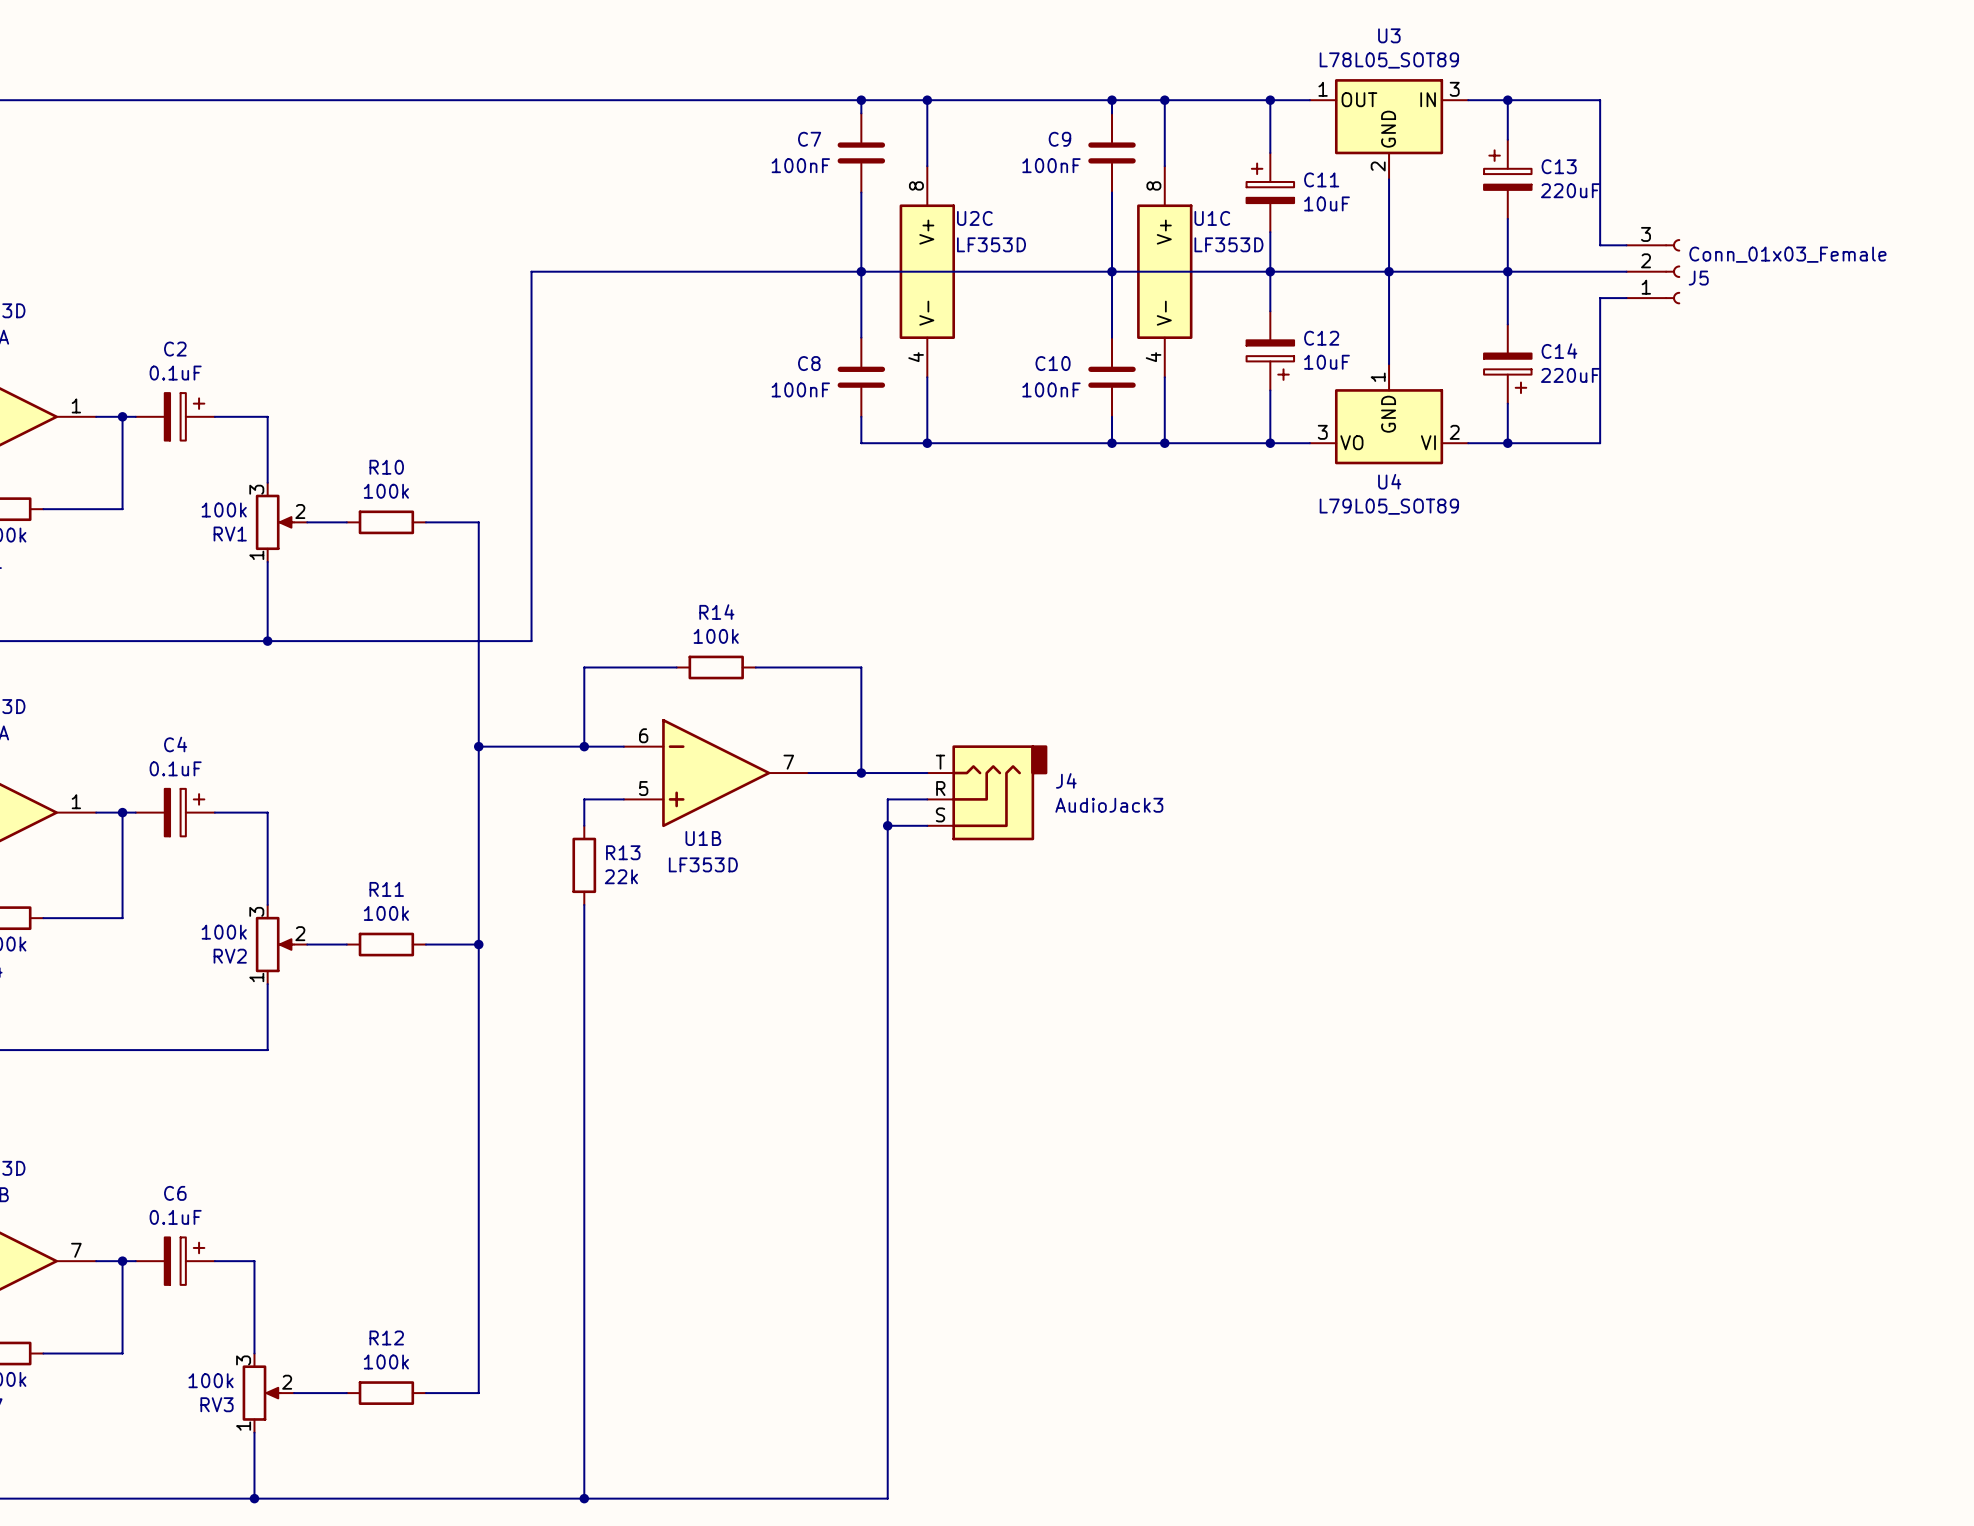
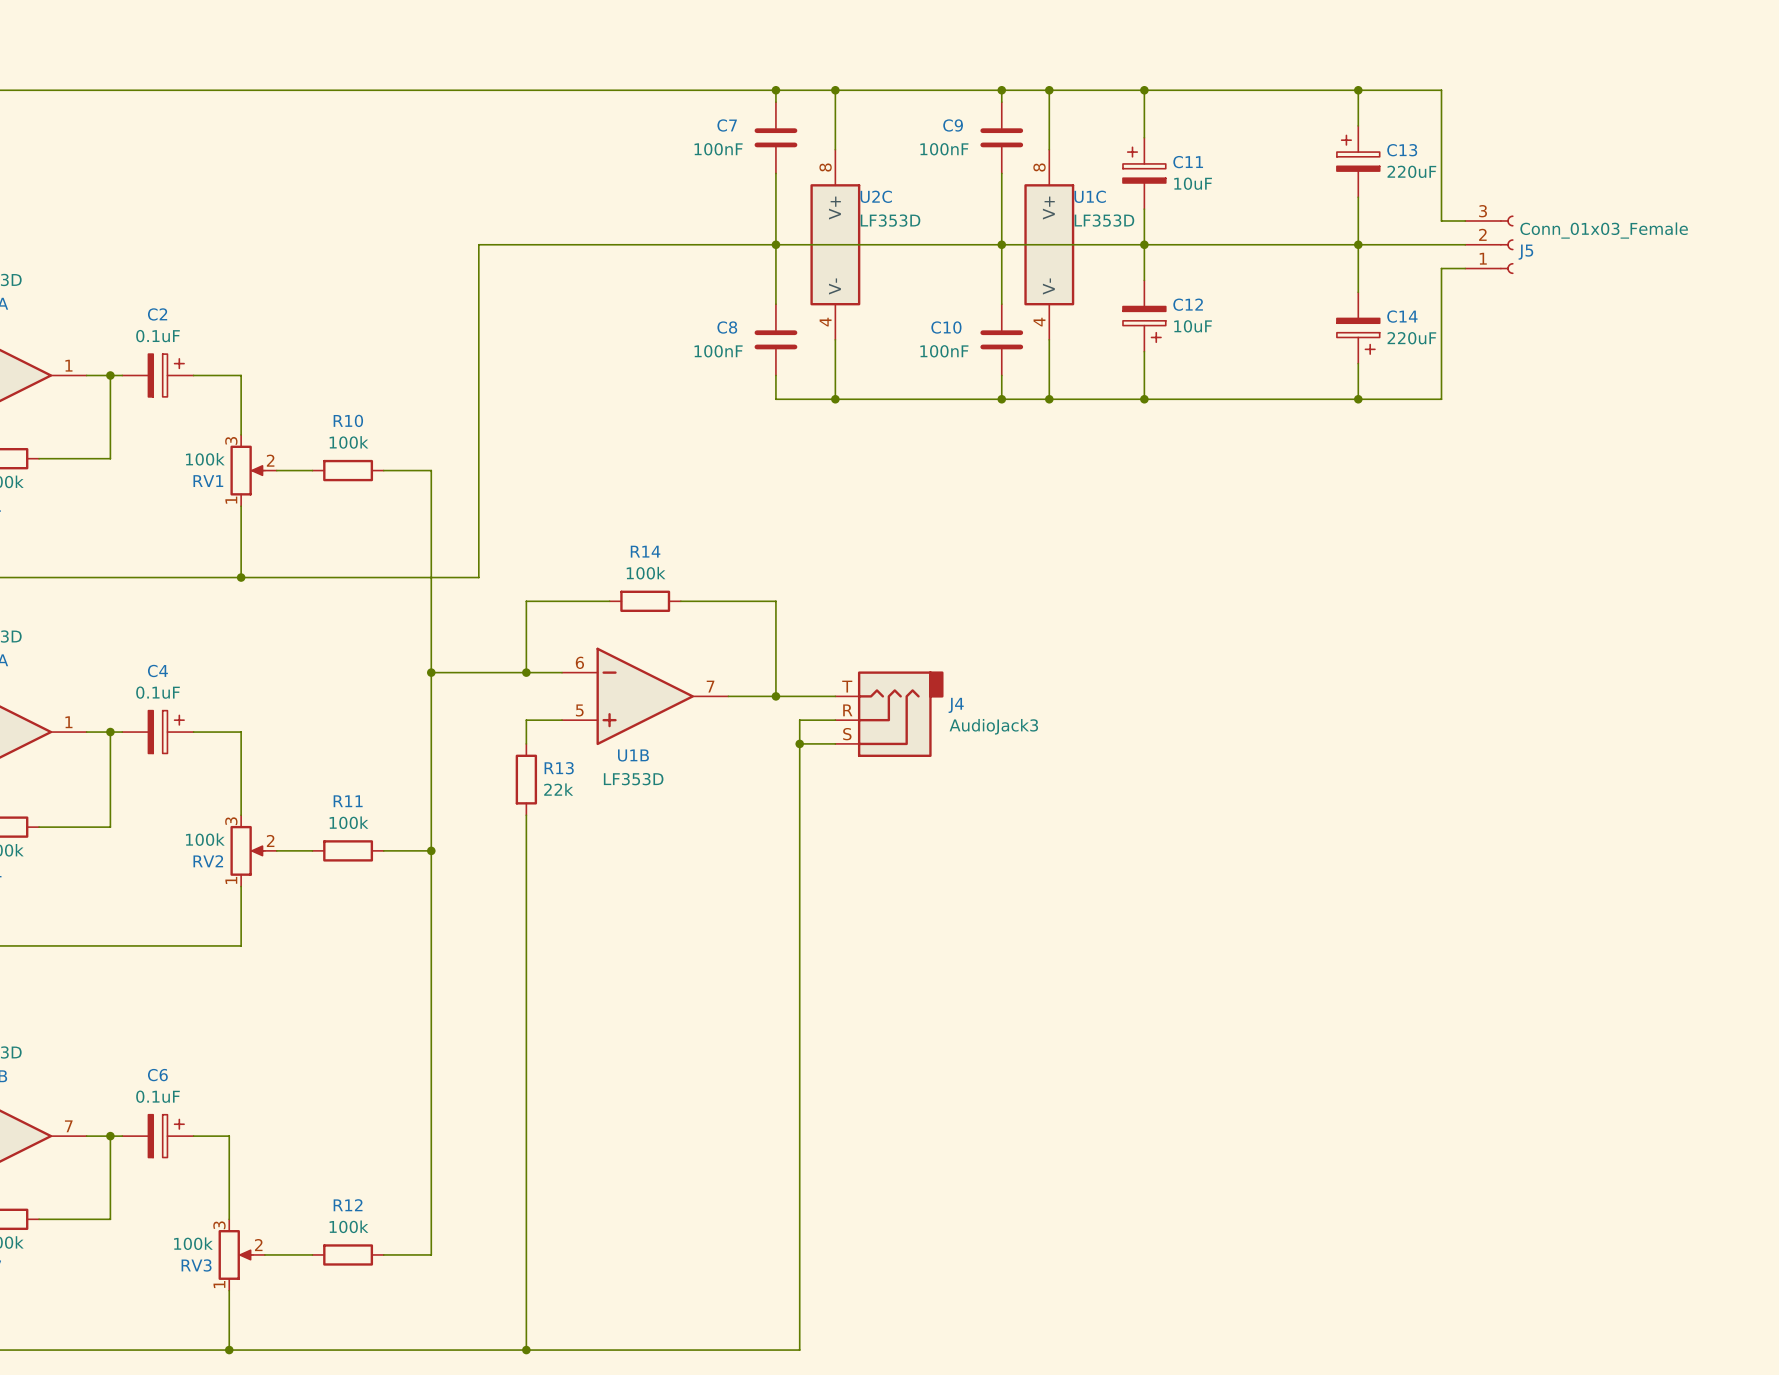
U3: L78L05_SOT89 (1389, 129) -> none
wire: (1389, 179) (1389, 364) -> none
junction: (1389, 271) -> none
U4: L79L05_SOT89 (1389, 414) -> none

